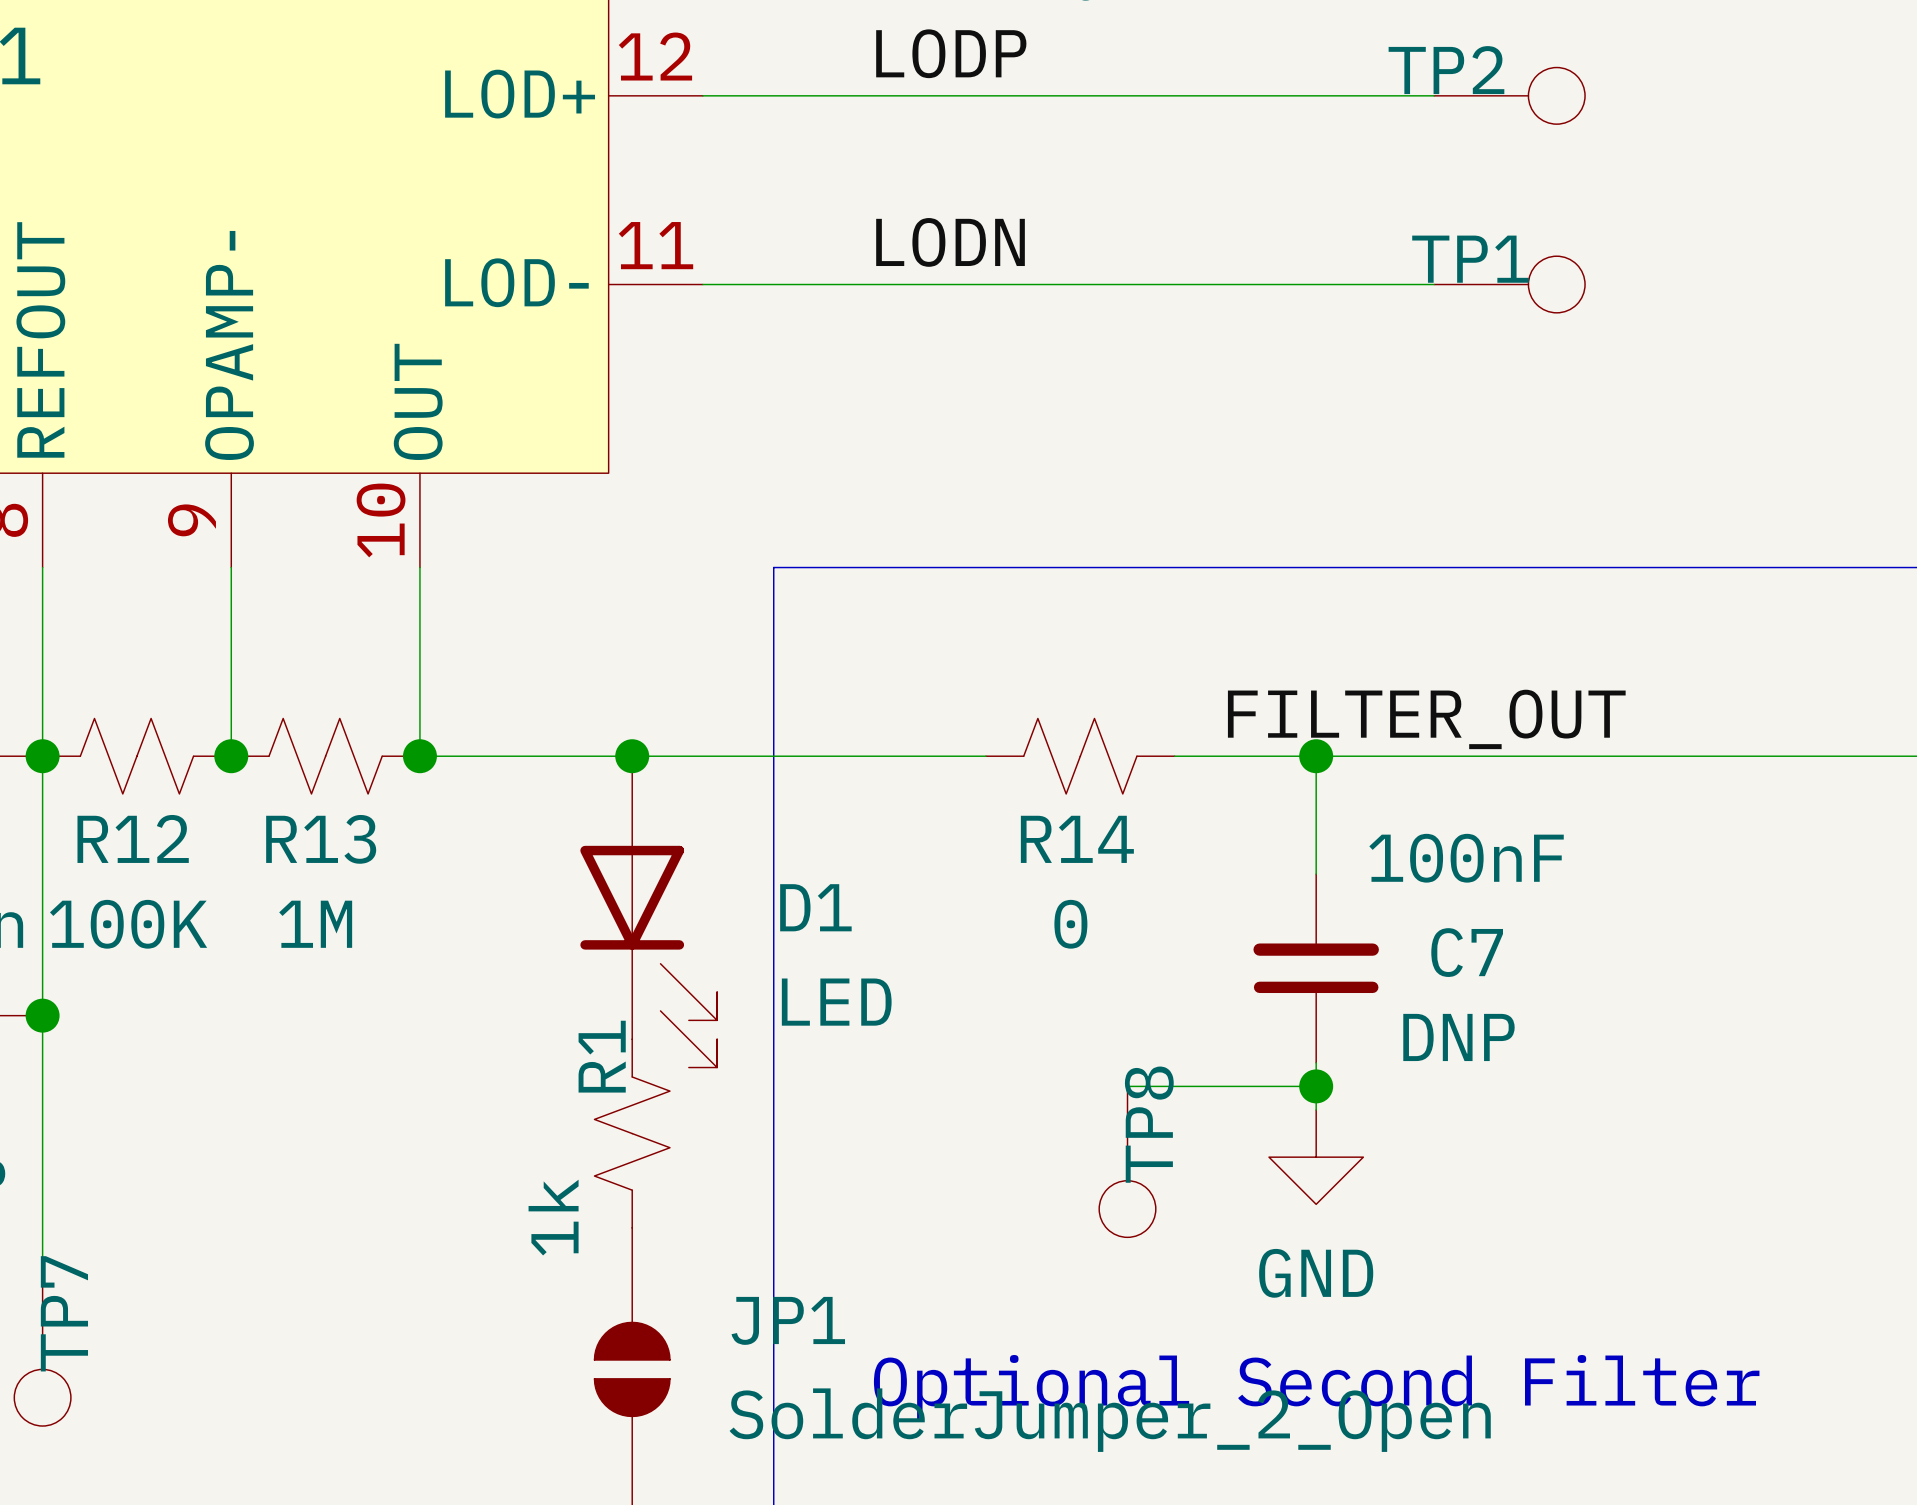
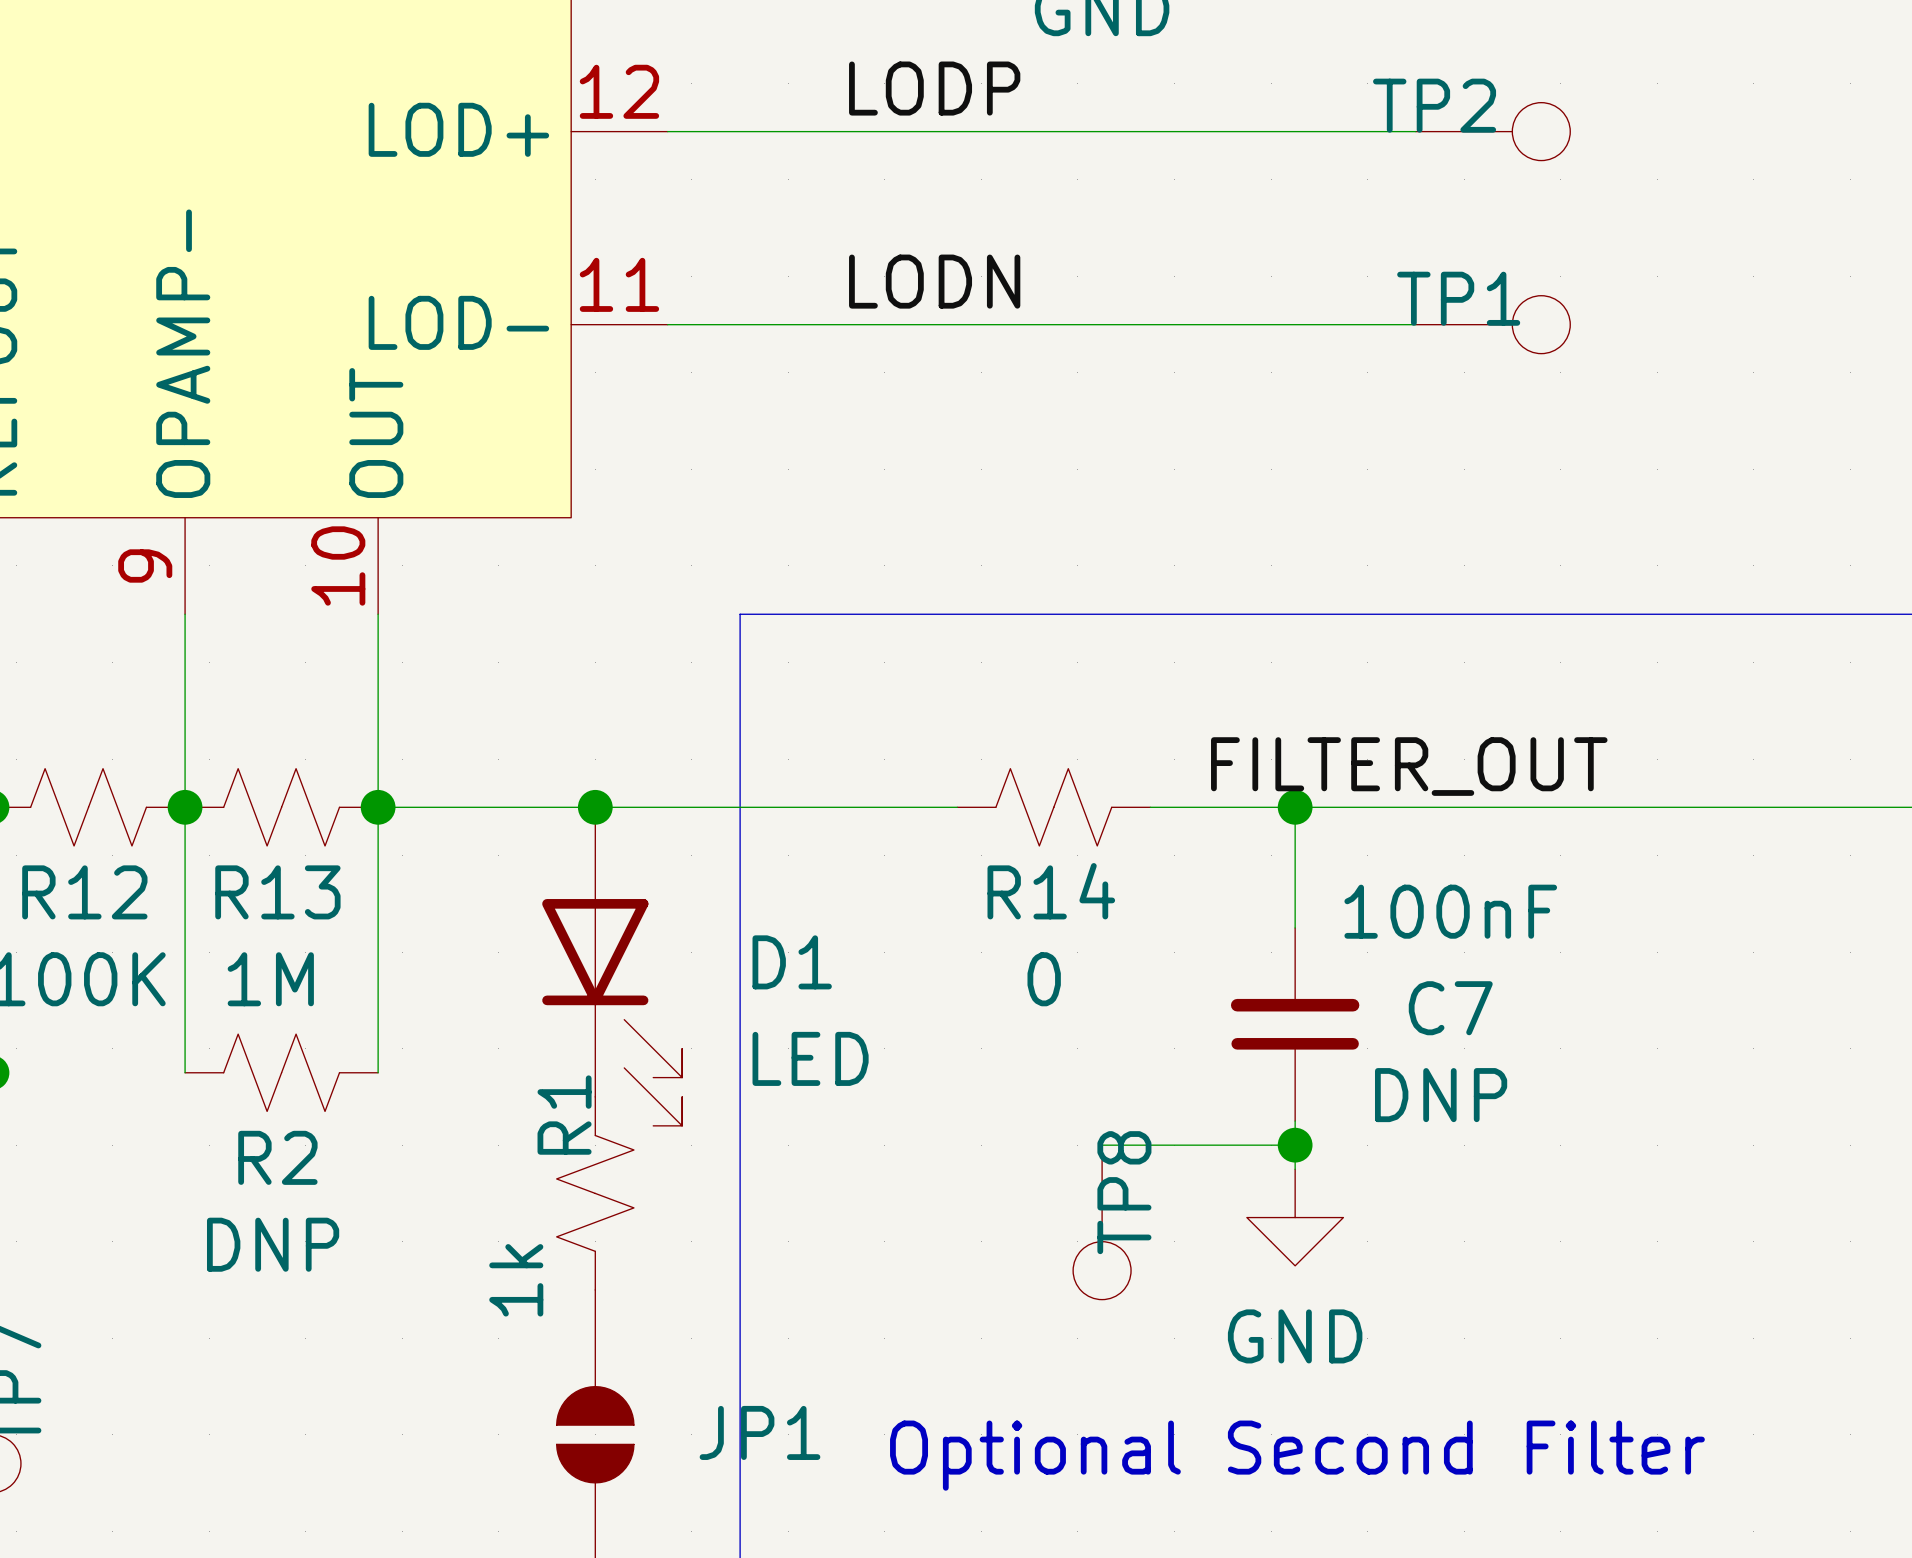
wire: none -> (185, 807) (185, 1072)
wire: none -> (378, 807) (378, 1072)
R2: none -> DNP (281, 1072)
JP1 name position: JP1 (788, 1320) -> JP1 (760, 1432)
JP1 value: SolderJumper_2_Open (1110, 1420) -> none

